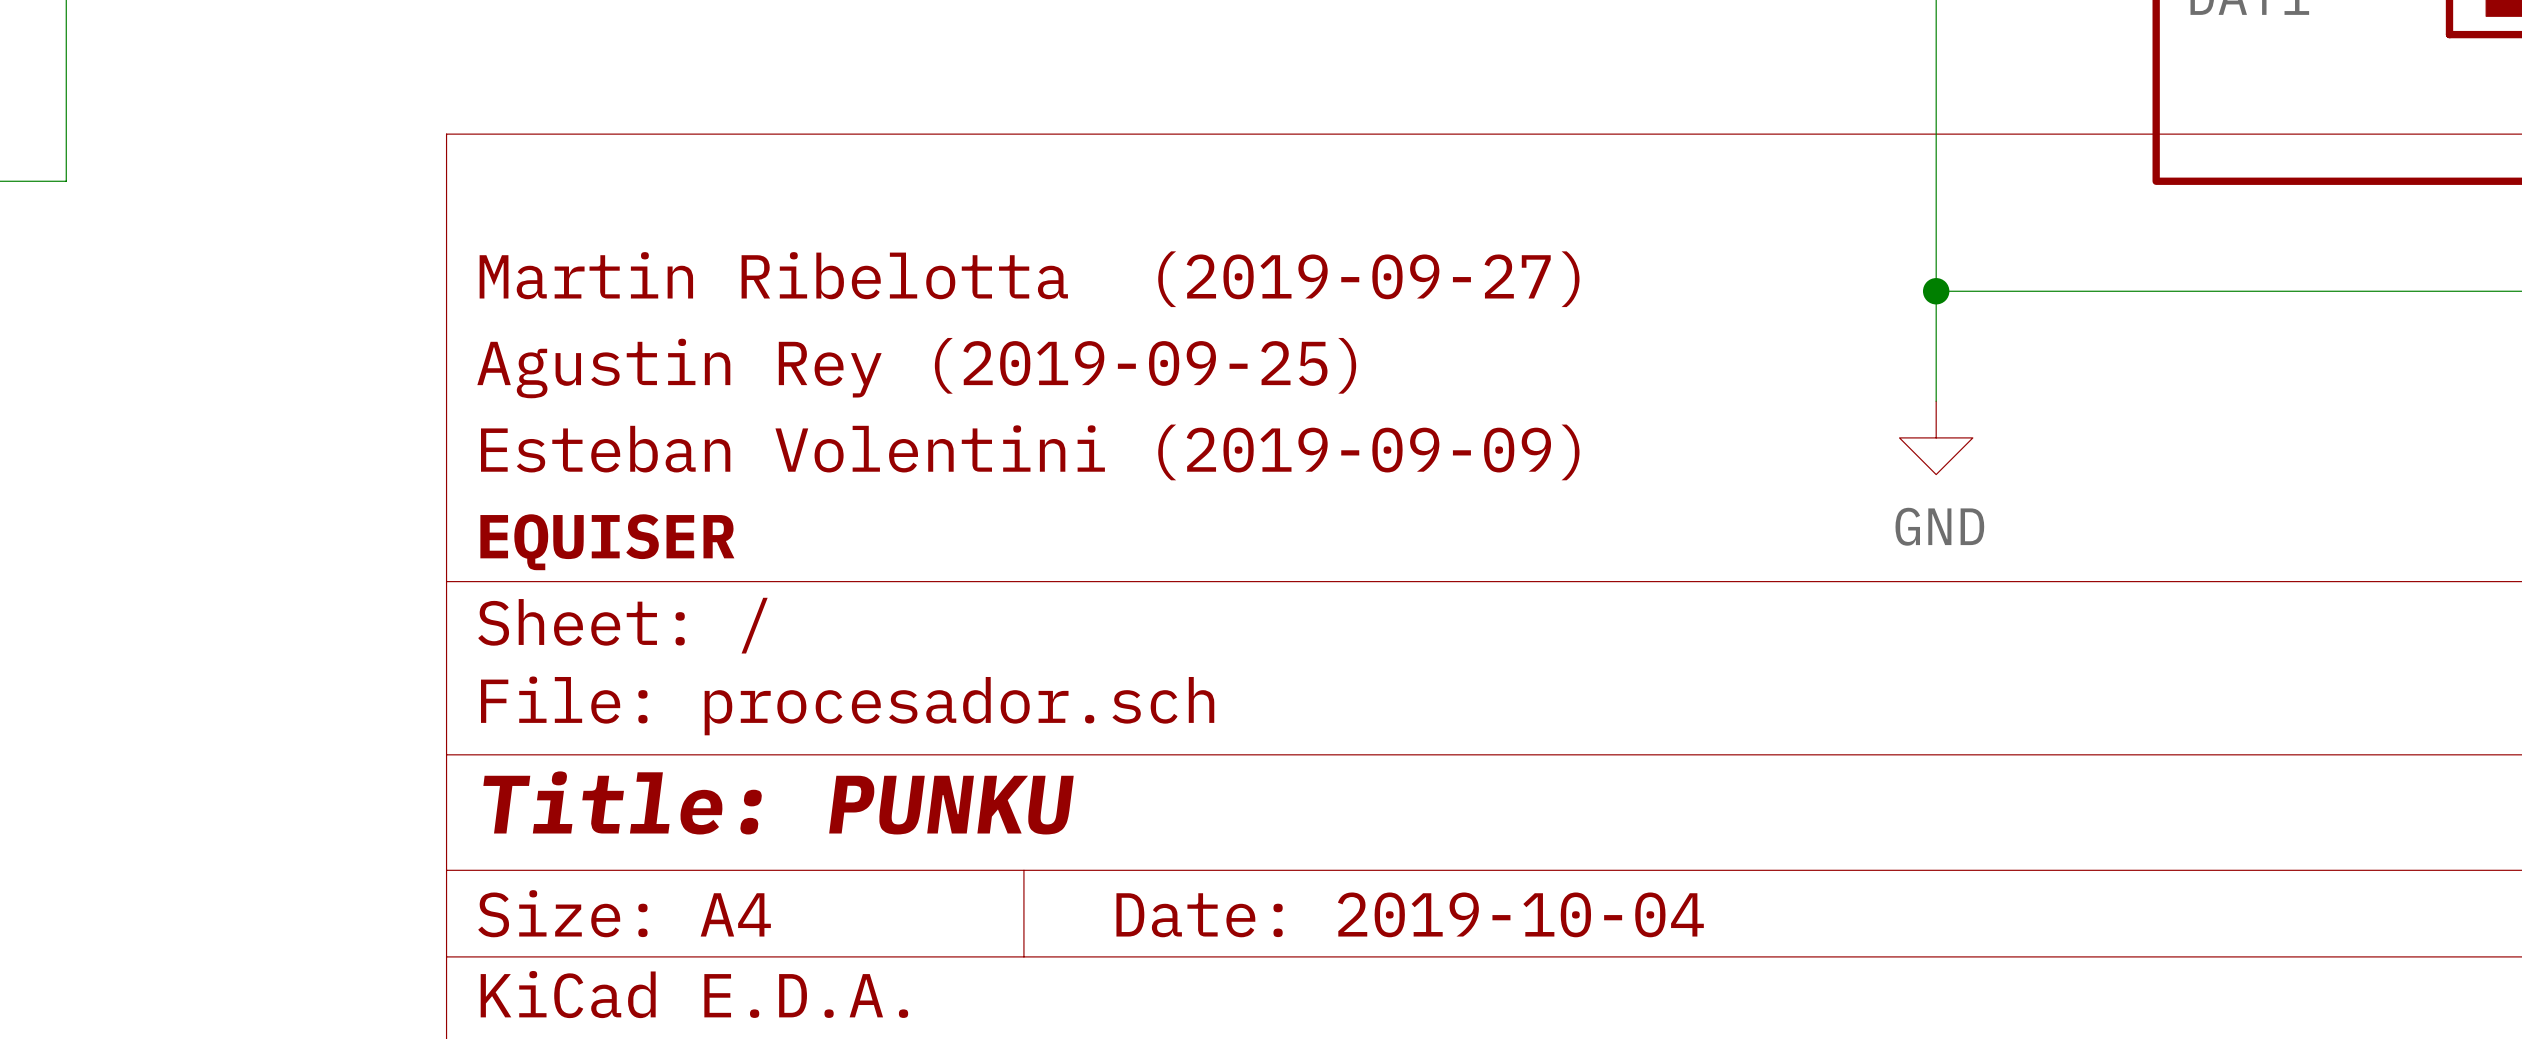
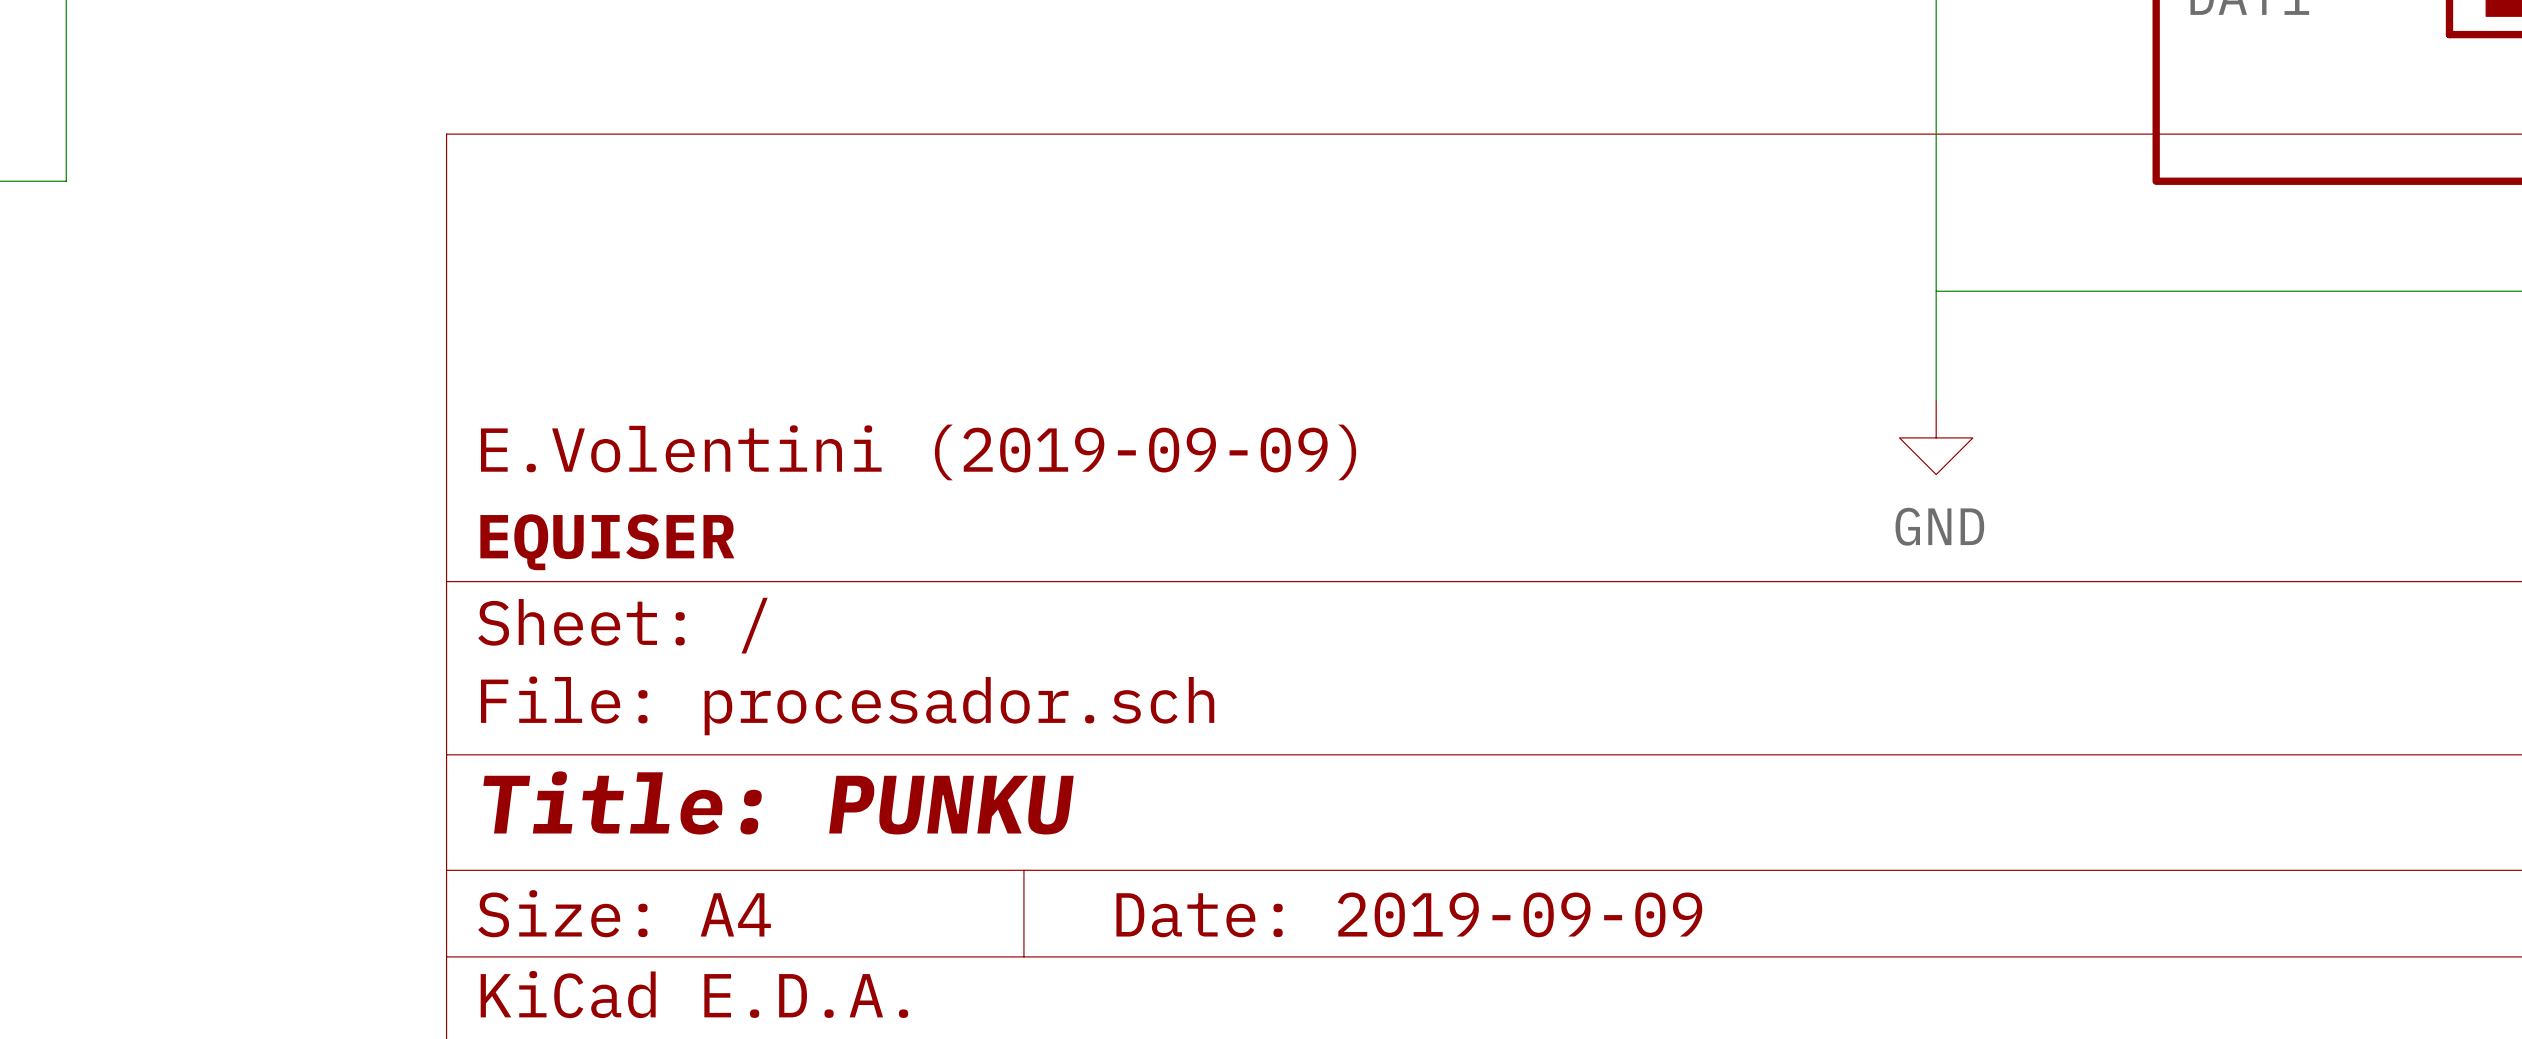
title block: Martin Ribelotta (2019-09-27) (1029, 279) -> none
junction: (1936, 291) -> none
title block: Agustin Rey (2019-09-25) (916, 368) -> none
title block: Esteban Volentini (2019-09-09) (1030, 452) -> E.Volentini (2019-09-09) (918, 452)
title block: Date: 2019-10-04 (1410, 914) -> Date: 2019-09-09 (1409, 914)

